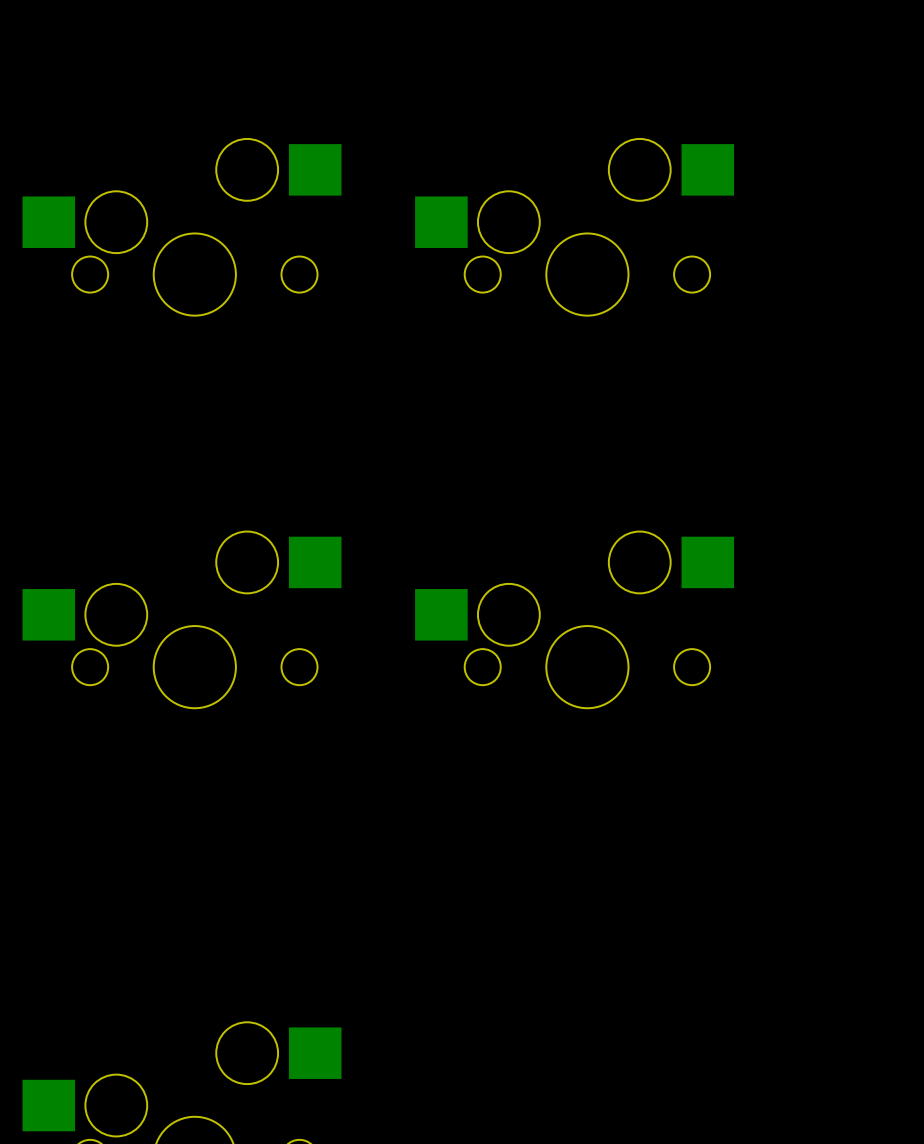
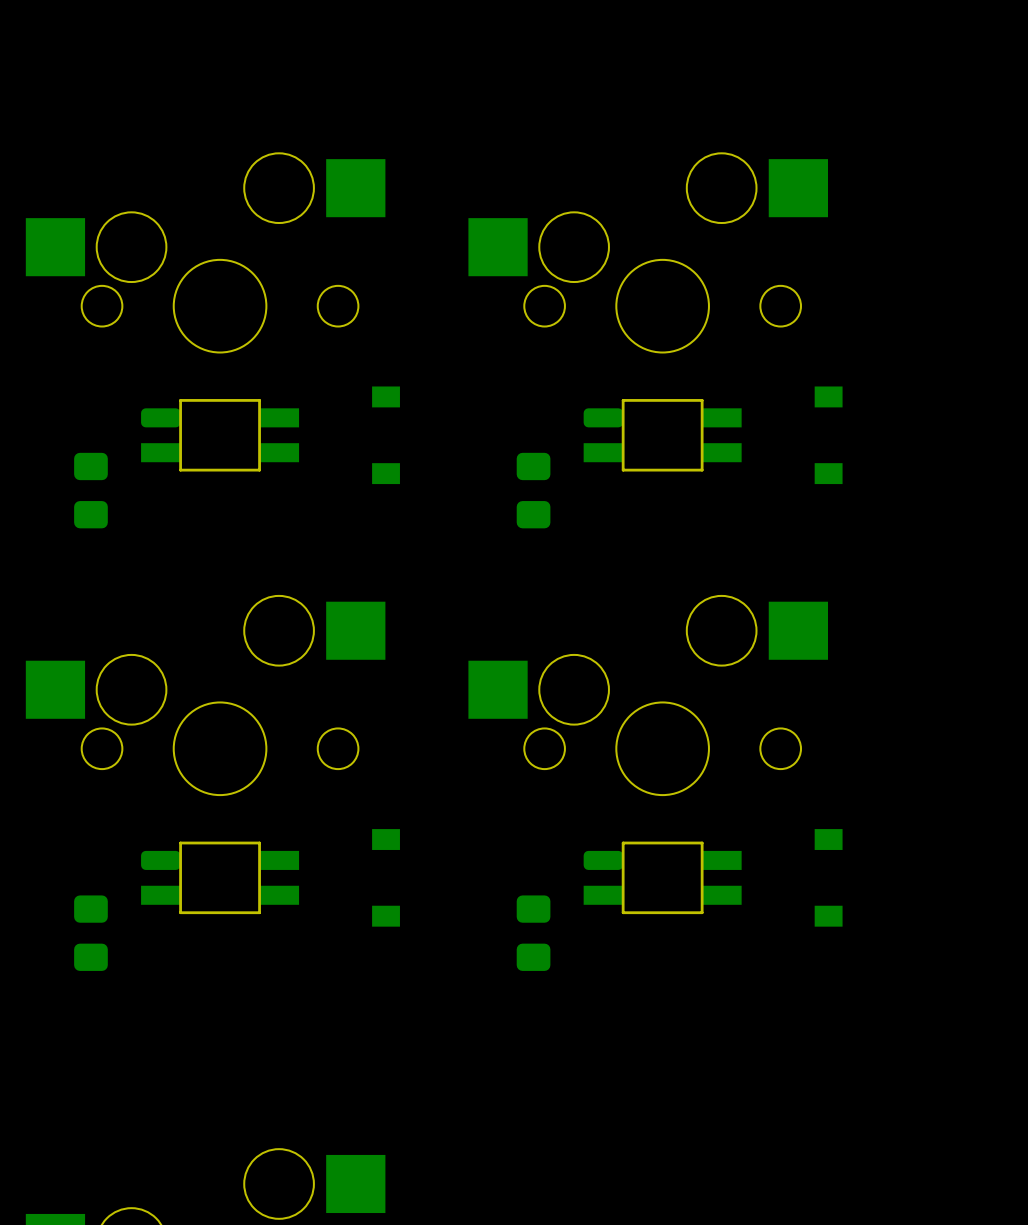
part: none -> (220, 435)
part: none -> (386, 435)
part: none -> (662, 435)
part: none -> (828, 435)
part: none -> (90, 490)
part: none -> (533, 490)
part: none -> (220, 877)
part: none -> (386, 877)
part: none -> (662, 877)
part: none -> (828, 877)
part: none -> (90, 933)
part: none -> (533, 933)

